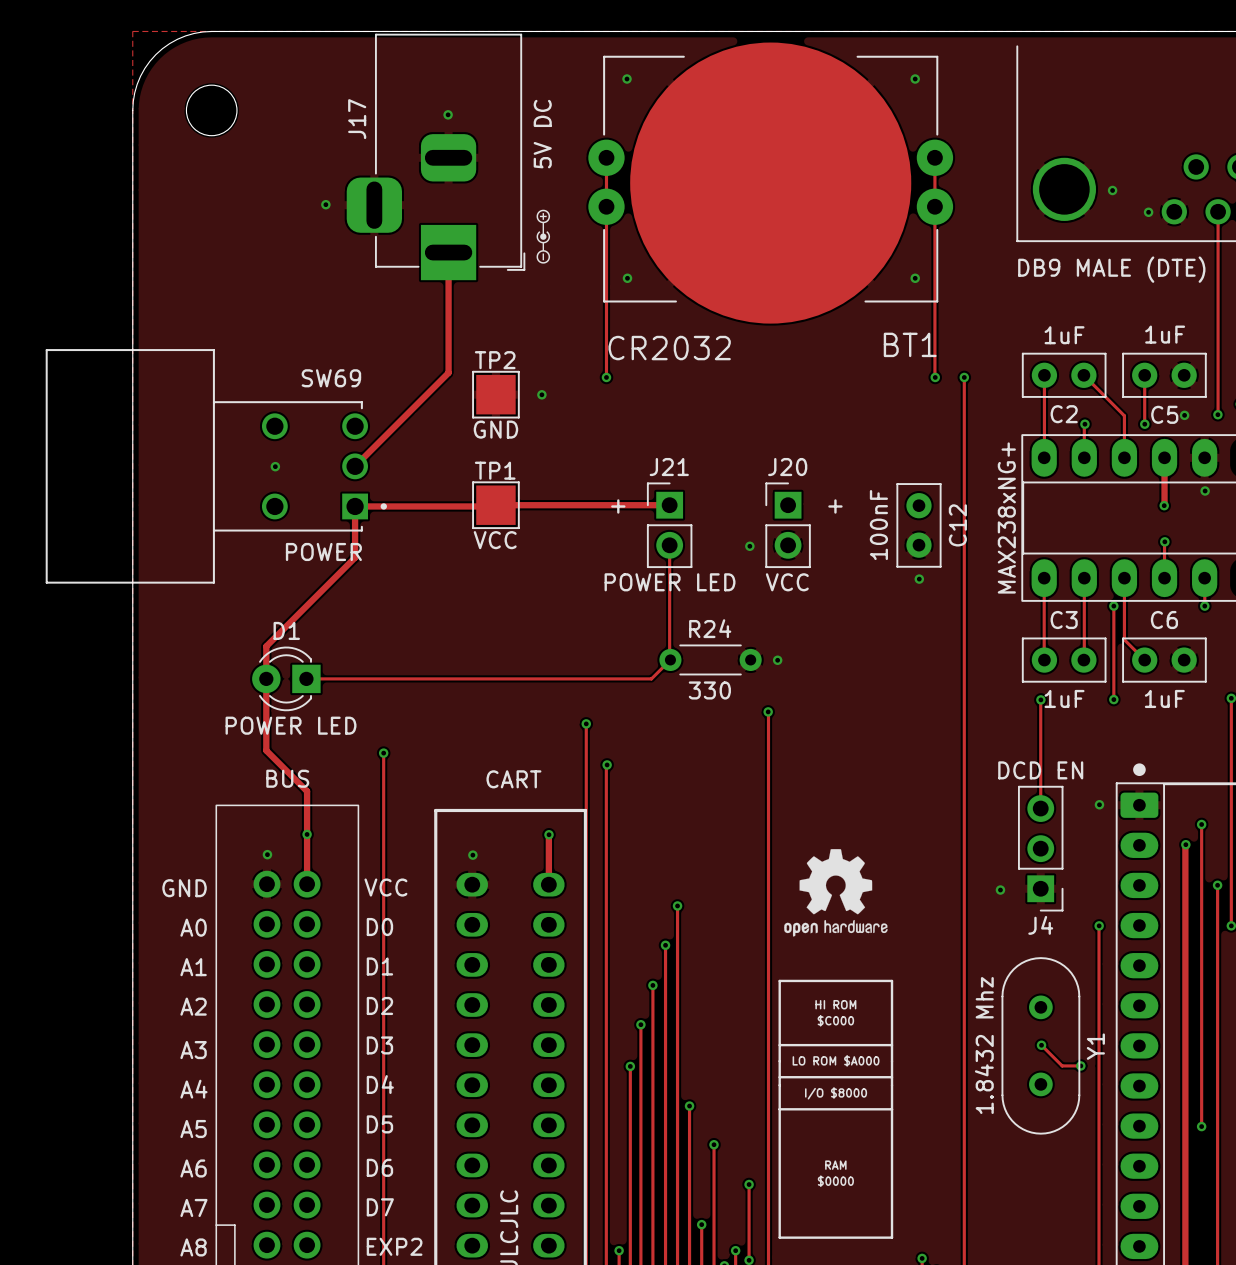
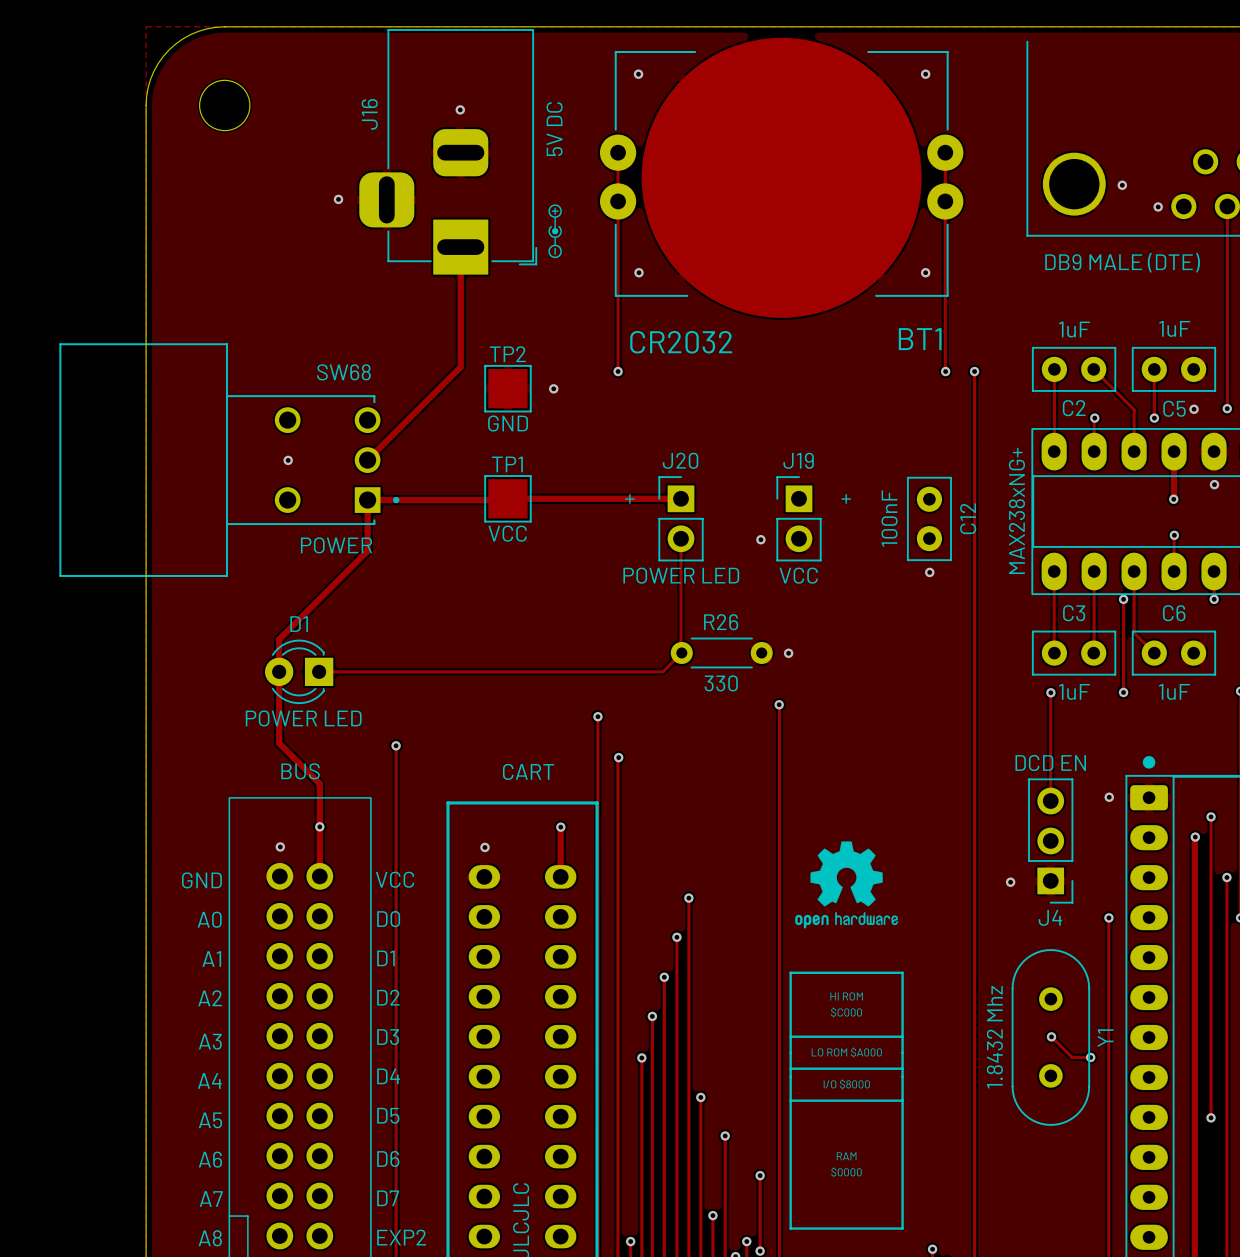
J17 name: J17 (357, 119) -> J16 (369, 114)
SW69 name: SW69 (331, 378) -> SW68 (343, 372)
J21 name: J21 (669, 467) -> J20 (680, 460)
J20 name: J20 (787, 467) -> J19 (798, 460)
R24 name: R24 (710, 628) -> R26 (721, 622)

